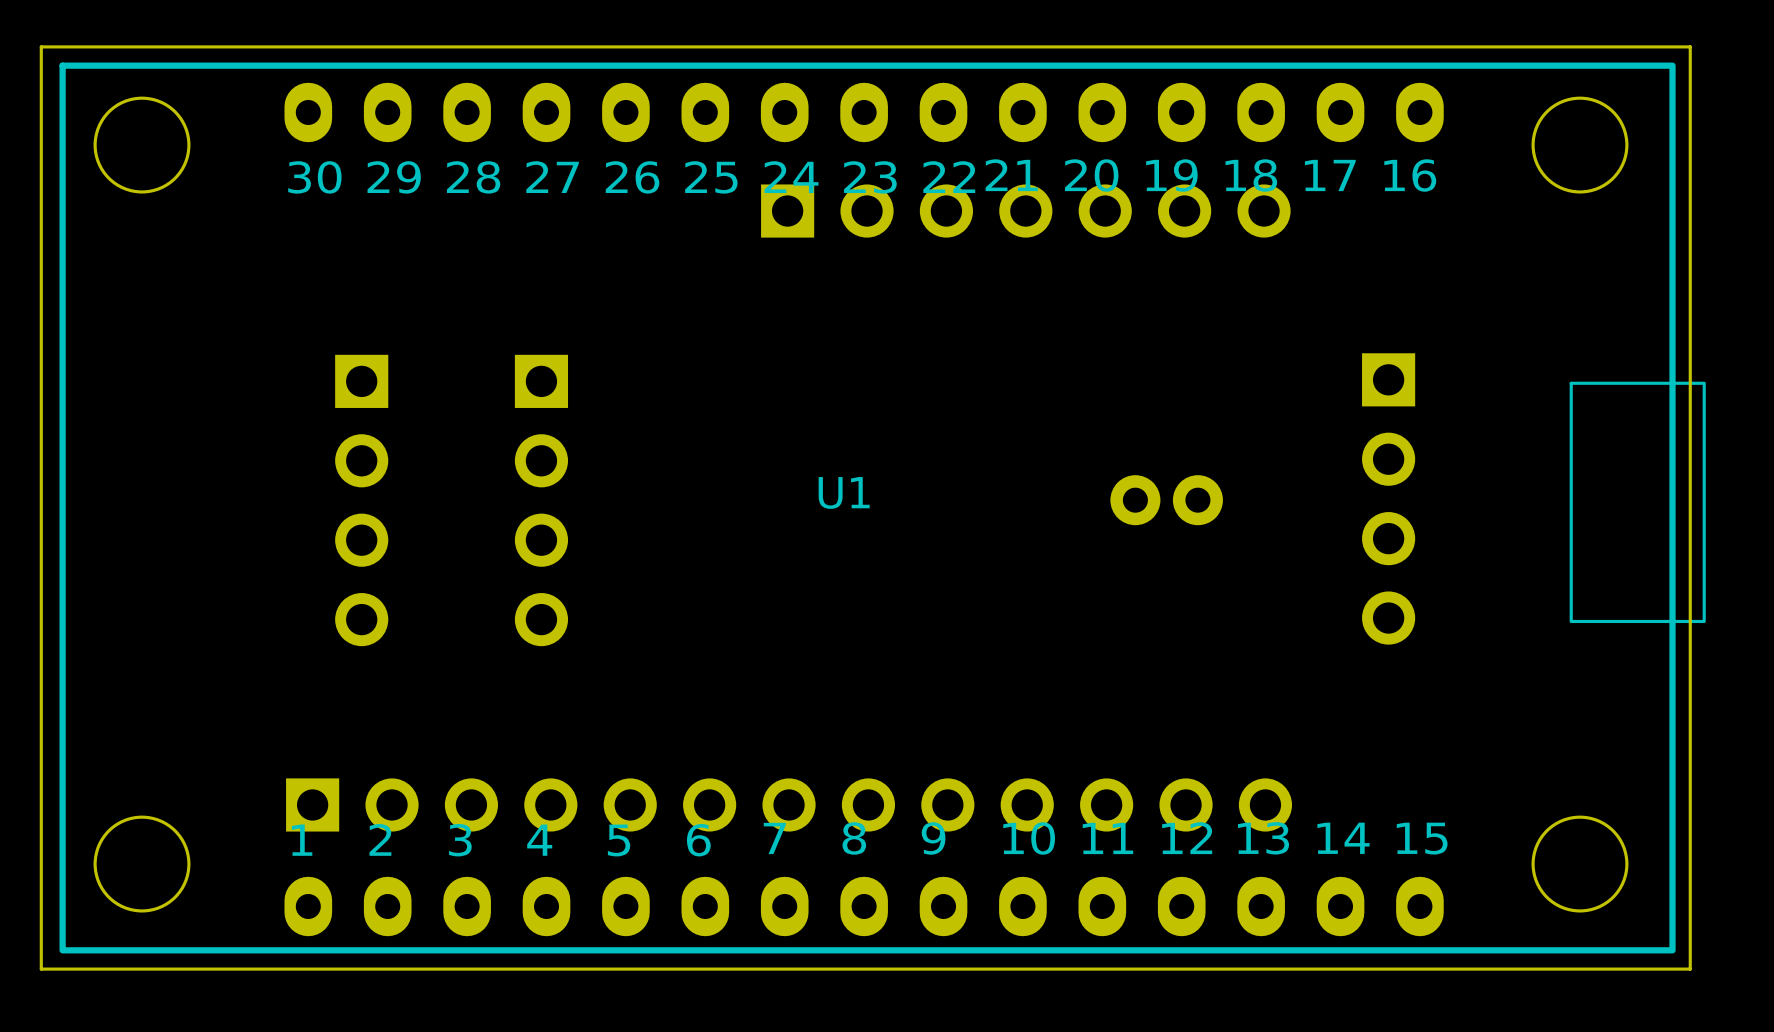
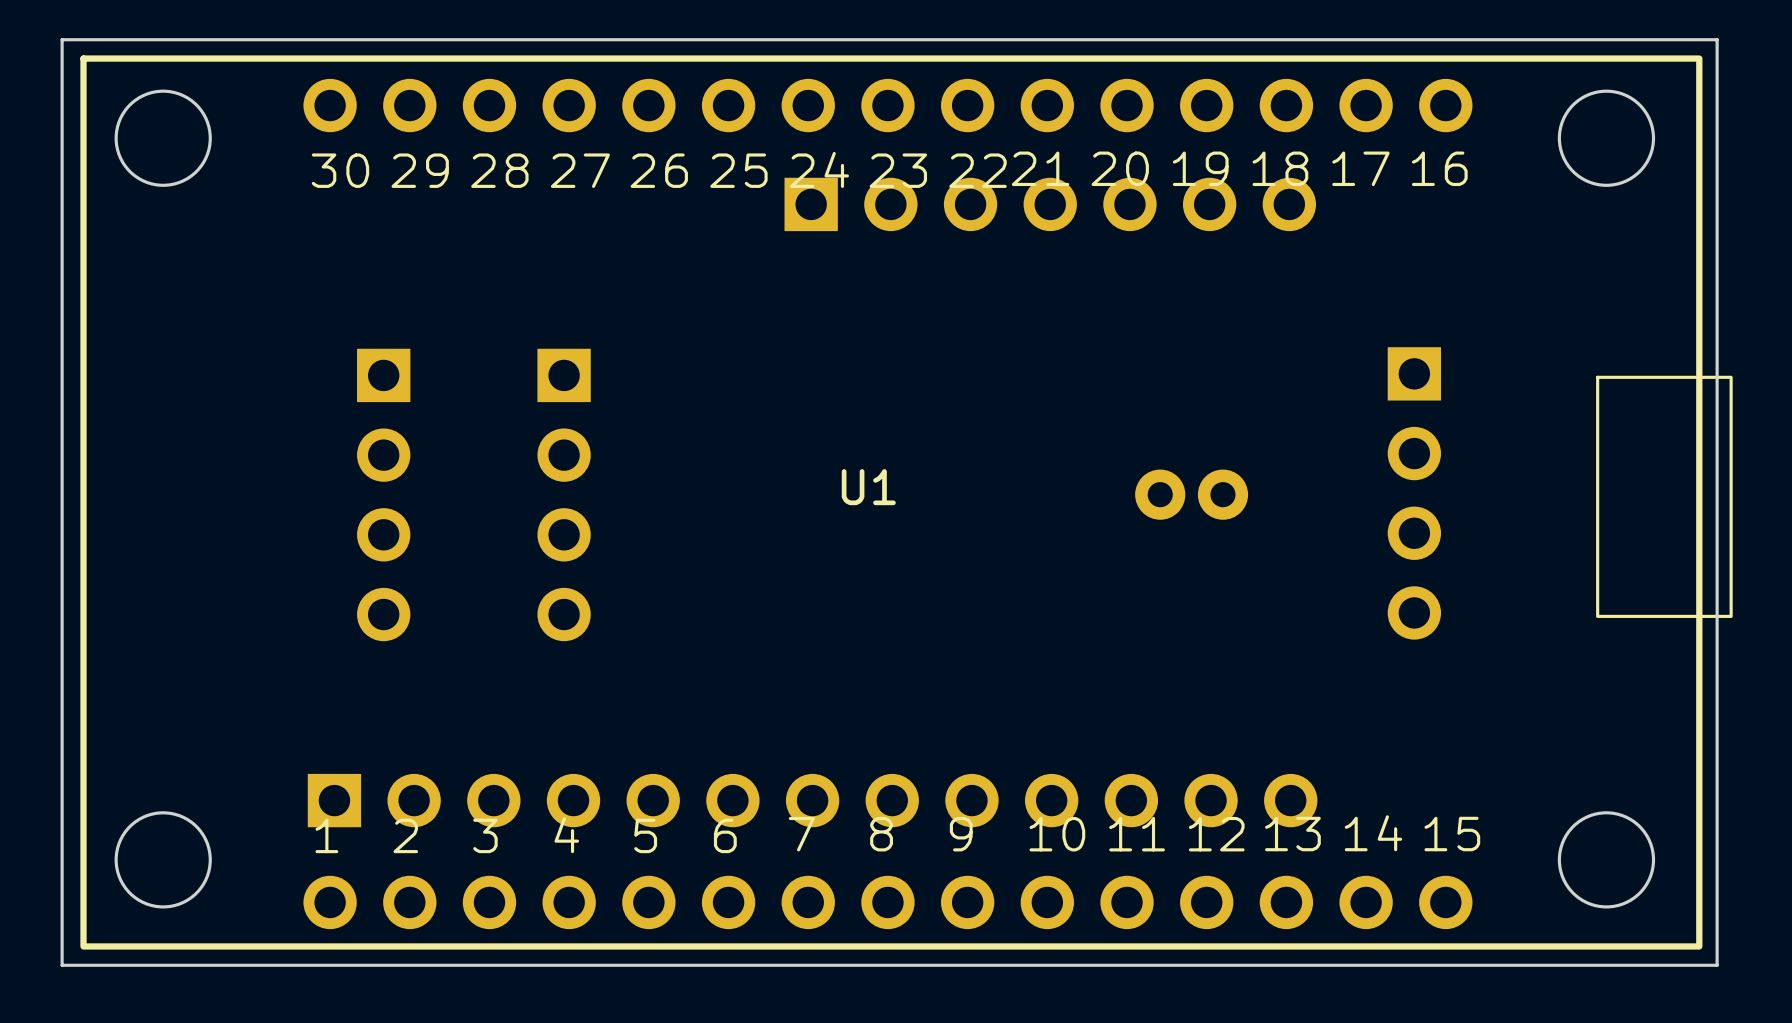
U1 footprint: [59, 62, 1706, 954] -> [80, 55, 1733, 950]

